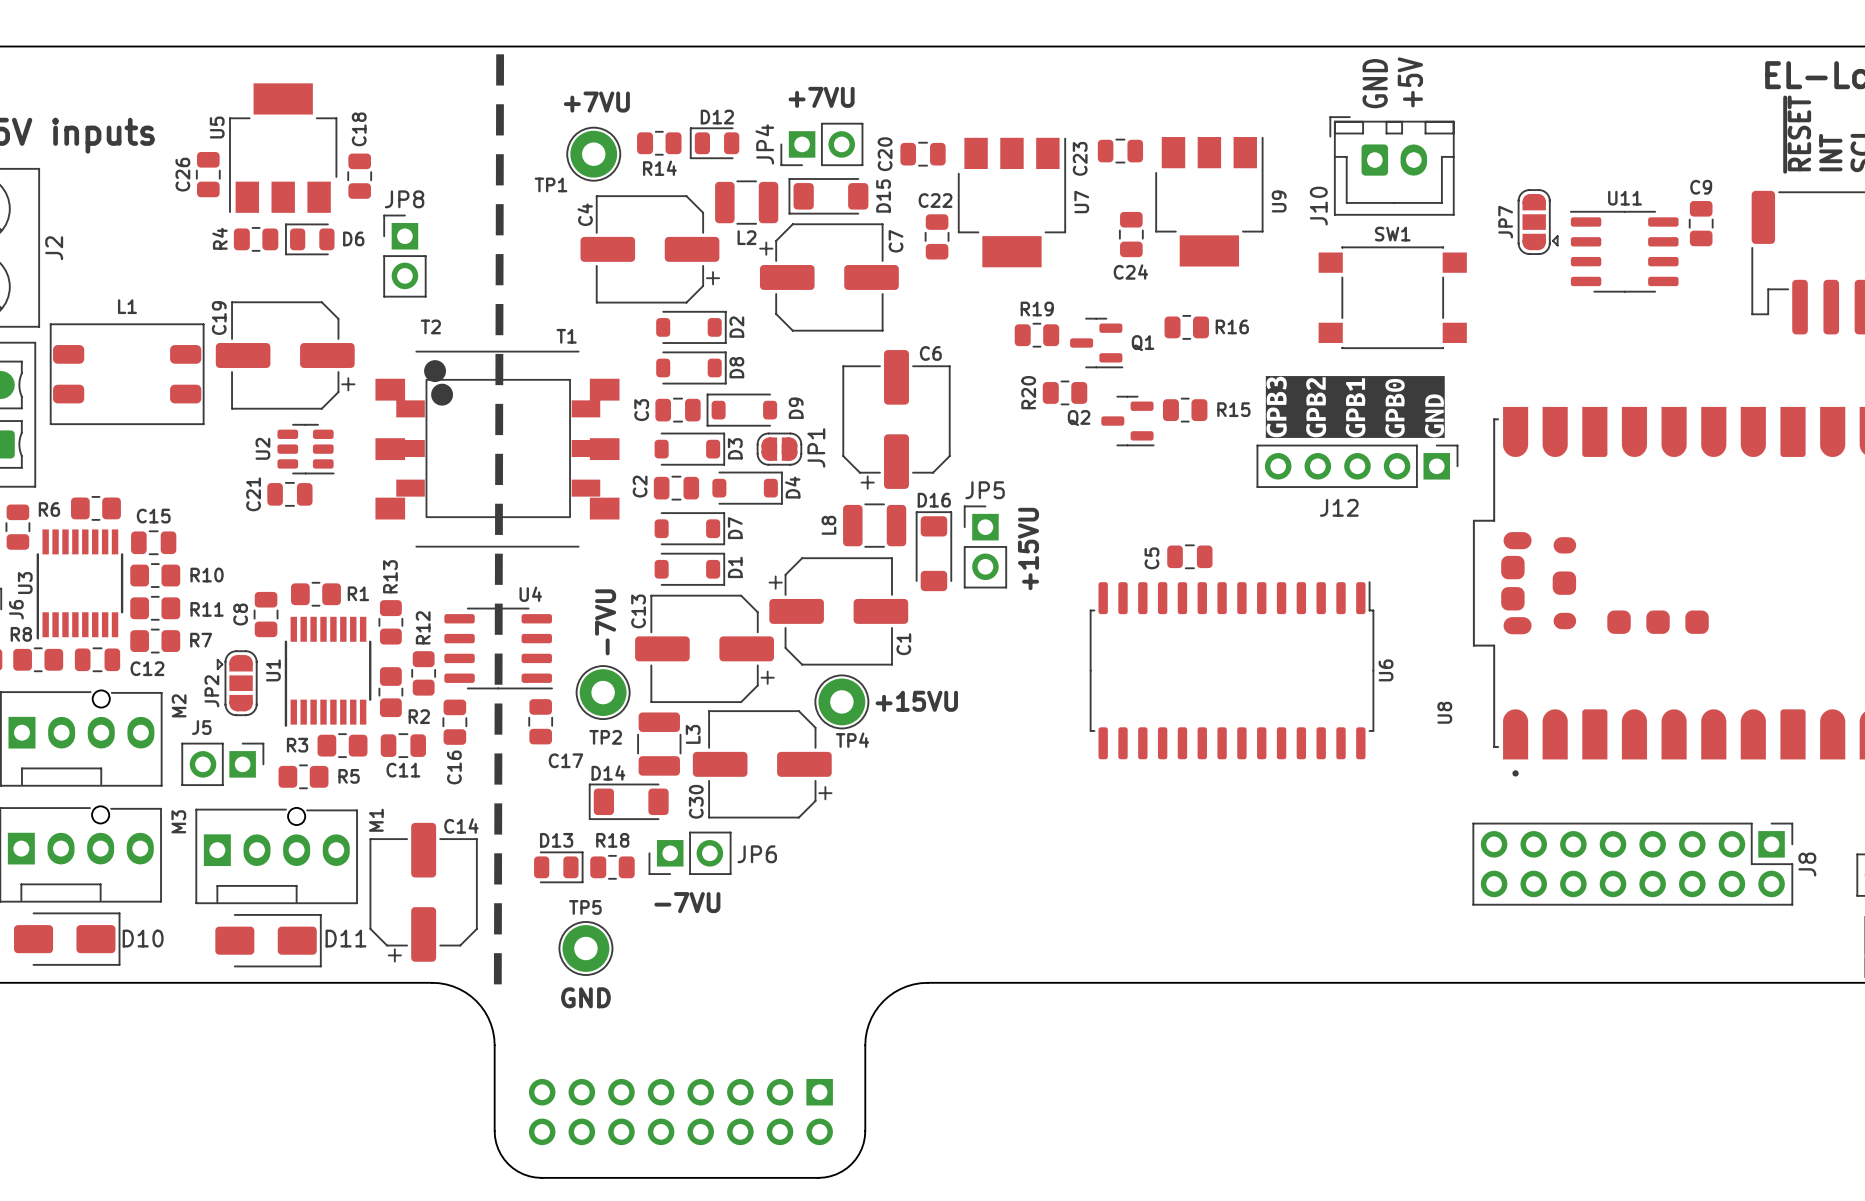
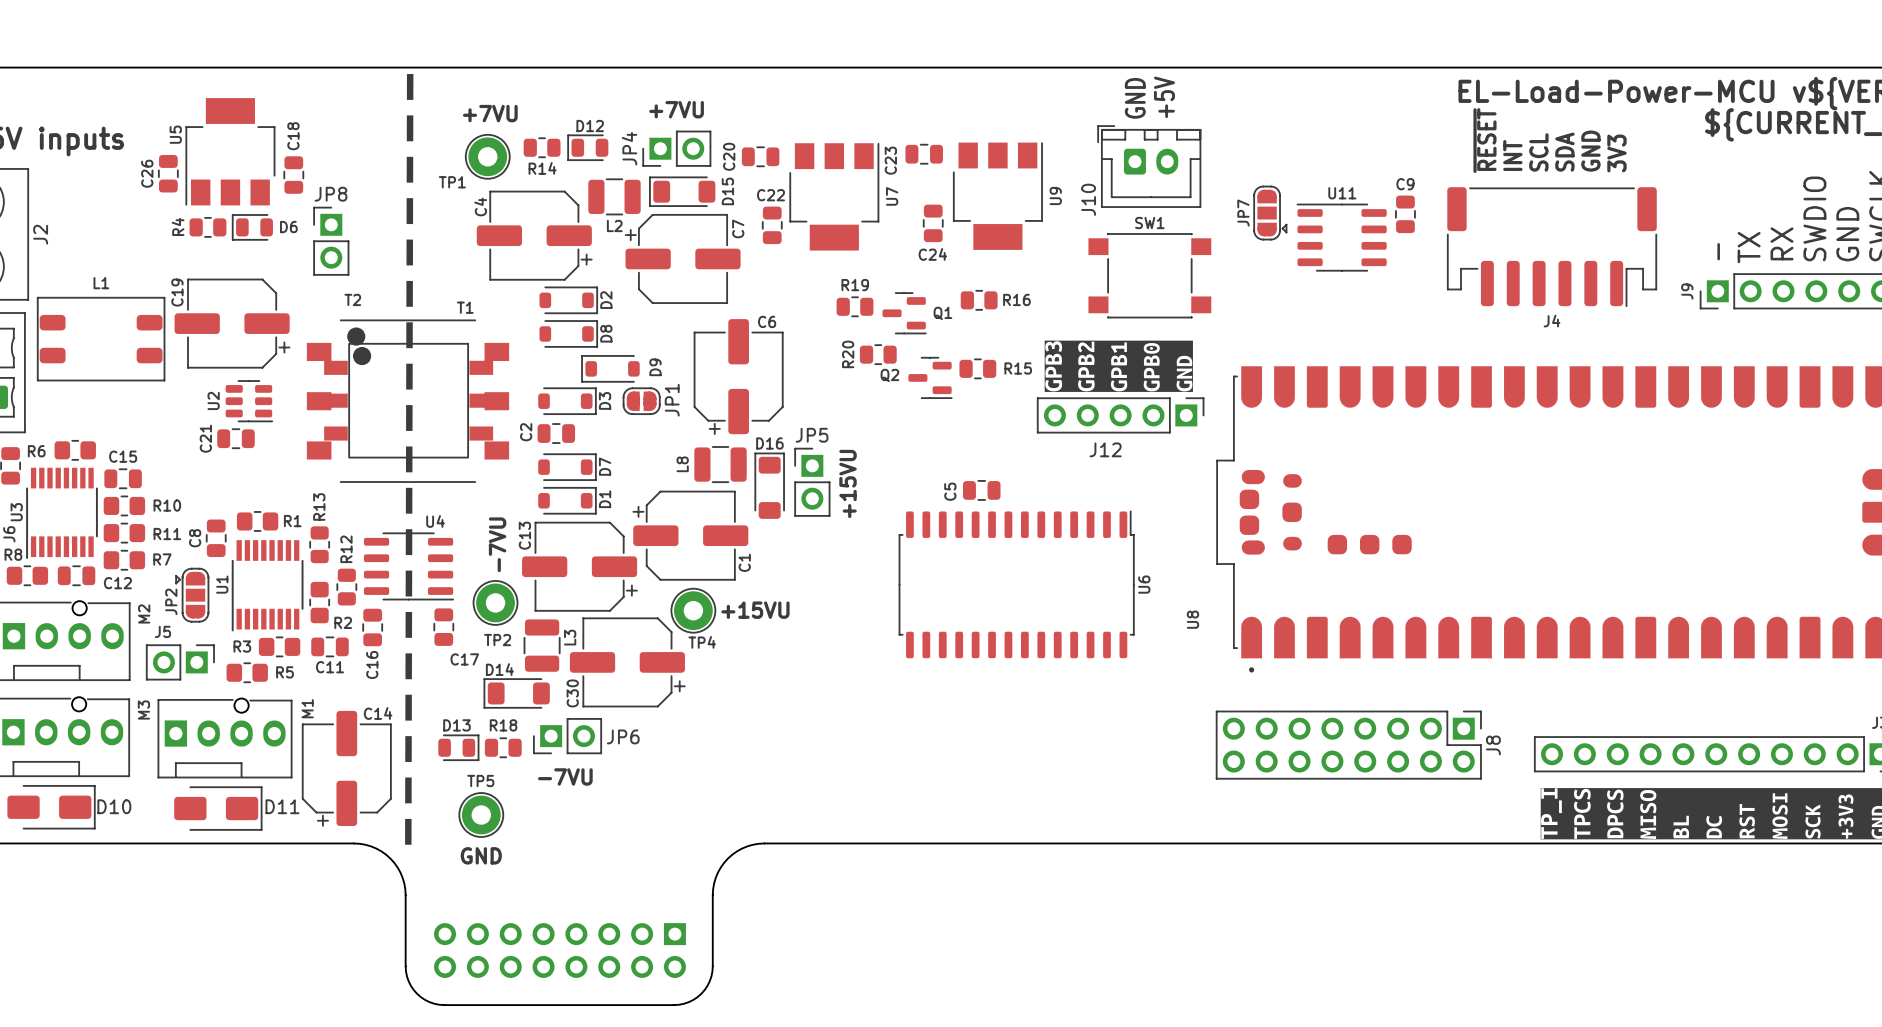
C3: (678, 410) -> none
D4: (747, 488) -> none

